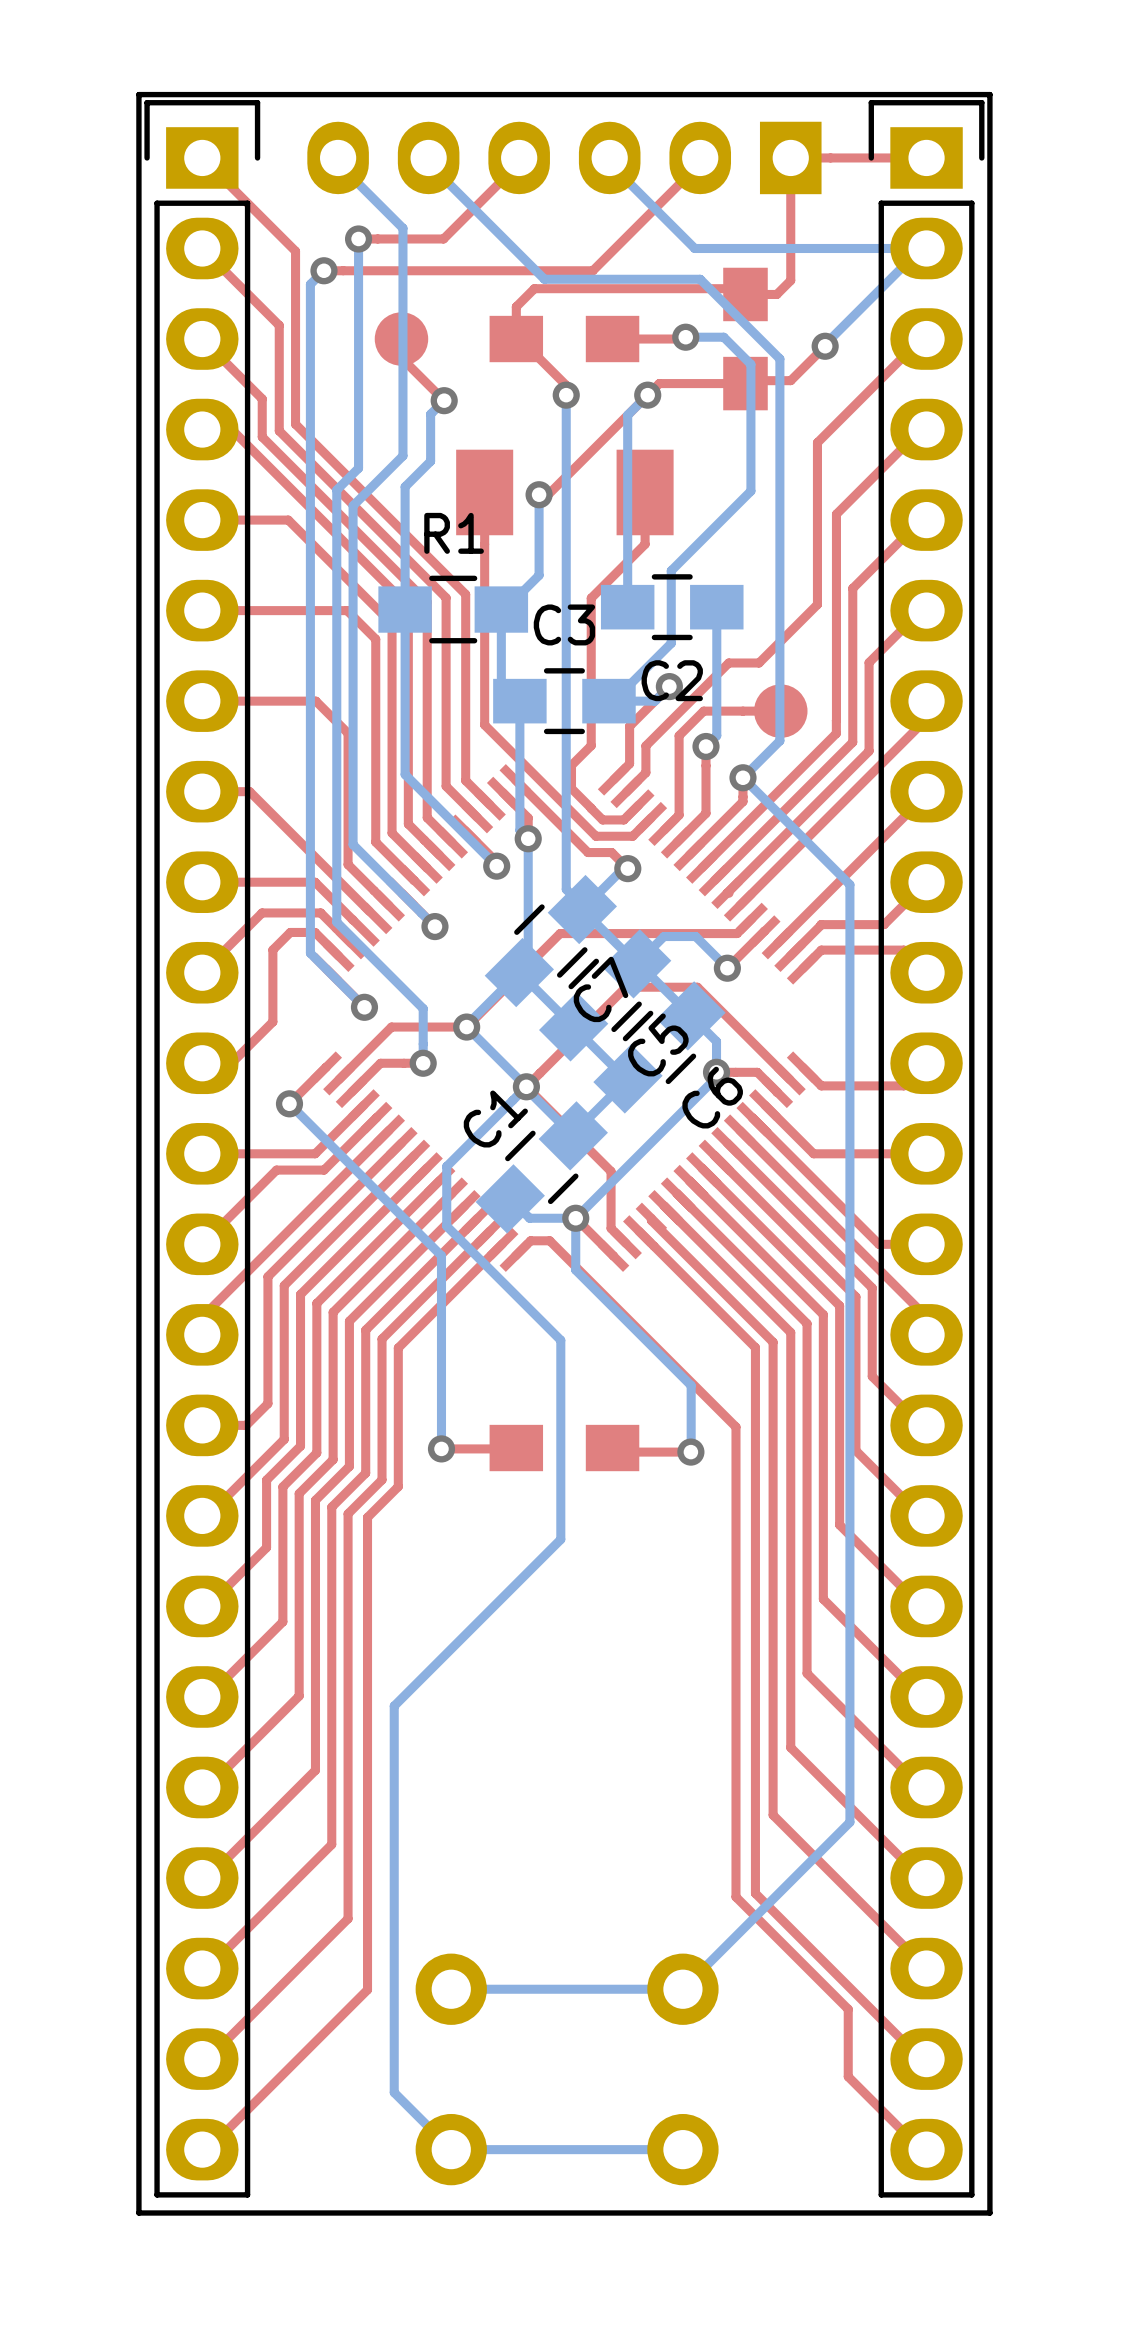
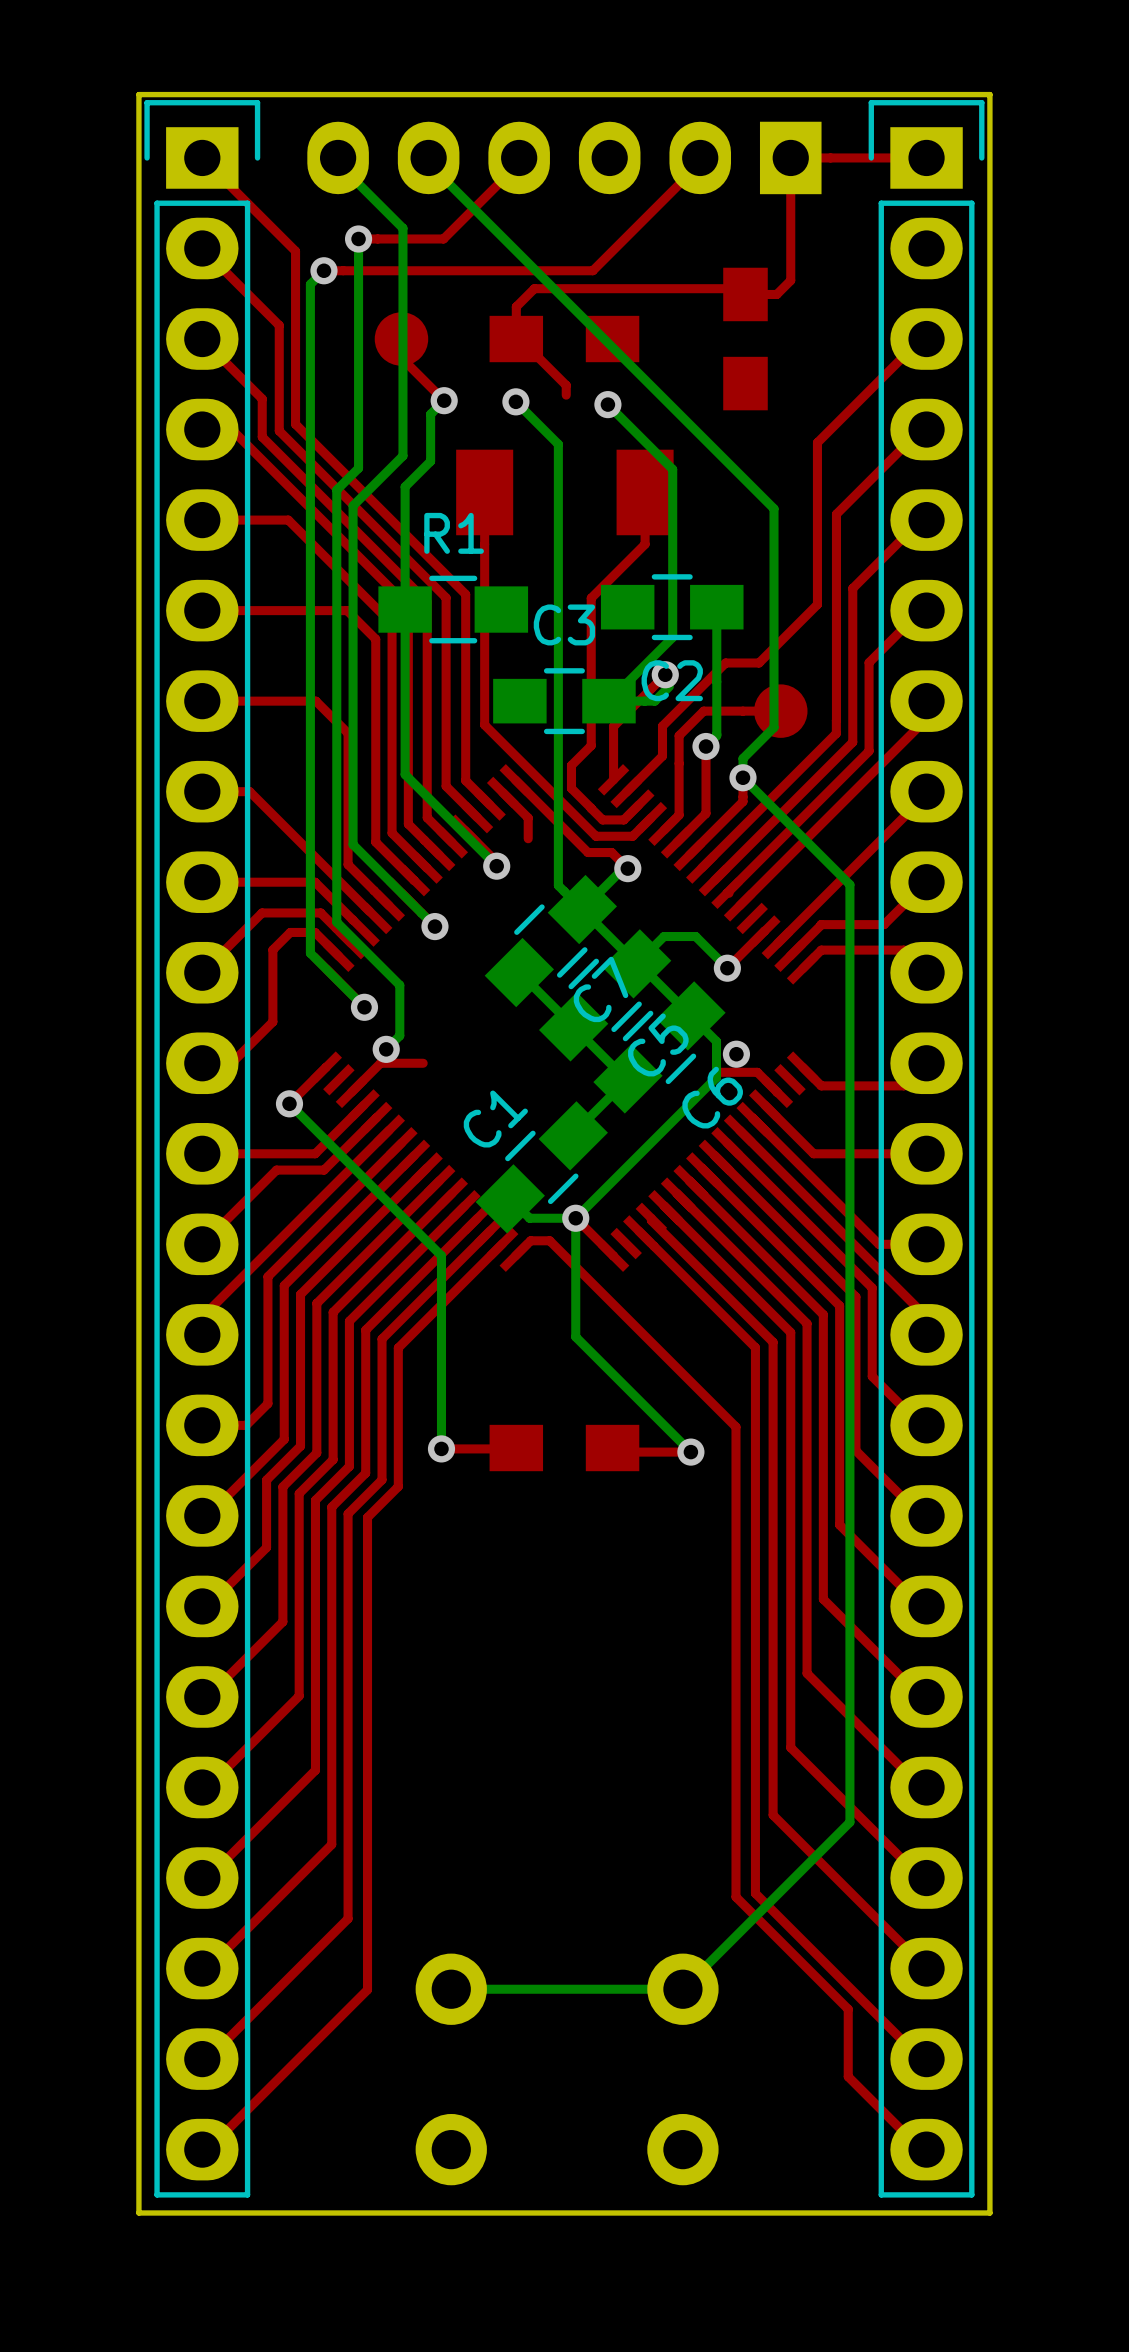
bottom track: (609, 157) (609, 163) (694, 248) (926, 248) -> none
bottom track: (921, 248) (825, 346) -> none
bottom track: (544, 279) (700, 279) (779, 358) (779, 740) (742, 777) -> (544, 279) (774, 508) (774, 727) (742, 758) (742, 777)
bottom track: (685, 337) (723, 337) (750, 364) (750, 491) (671, 570) (671, 643) (613, 701) -> none
top track: (685, 337) (683, 339) (616, 339) -> none
via: (685, 337) -> none
top track: (825, 346) (790, 380) (745, 379) (745, 383) (659, 383) (548, 494) (539, 494) -> none
via: (825, 346) -> none
bottom track: (566, 395) (566, 889) (582, 905) (582, 909) -> (515, 401) (558, 444) (558, 885) (582, 909)
via: (566, 395) -> none
bottom track: (647, 395) (627, 415) (627, 607) -> none
via: (647, 395) -> none
via: none -> (515, 401)
bottom track: none -> (607, 404) (672, 469) (672, 637) (608, 701)
via: none -> (607, 404)
bottom track: (539, 494) (539, 575) (504, 609) (501, 609) (501, 682) (519, 701) (519, 830) (528, 838) (528, 963) (466, 1025) (526, 1086) -> none
via: (539, 494) -> none
top track: (728, 663) (645, 745) (645, 772) -> (728, 663) (725, 663) (662, 726) (662, 756) (645, 772)
top track: (669, 686) (629, 726) (629, 763) (613, 779) -> (665, 674) (613, 726) (613, 779)
via position: (669, 686) -> (665, 674)
via: (528, 838) -> none
top track: (752, 918) (737, 933) (560, 933) (466, 1027) (391, 1027) (338, 1079) -> none
bottom track: (399, 985) (423, 1008) (423, 1063) -> (399, 985) (399, 1035) (386, 1049)
via: (466, 1027) -> none
via position: (423, 1063) -> (386, 1049)
via position: (716, 1072) -> (736, 1054)
top track: (789, 1079) (697, 987) (625, 987) (526, 1086) (611, 1171) (611, 1228) (626, 1243) -> none
bottom track: (526, 1086) (446, 1166) (446, 1226) (560, 1340) (560, 1539) (394, 1706) (394, 2092) (451, 2149) (682, 2149) -> none
bottom track: (526, 1086) (526, 1088) (573, 1135) -> none
via: (526, 1086) -> none
bottom track: (575, 1270) (691, 1385) (691, 1452) -> (575, 1270) (575, 1336) (690, 1452)

